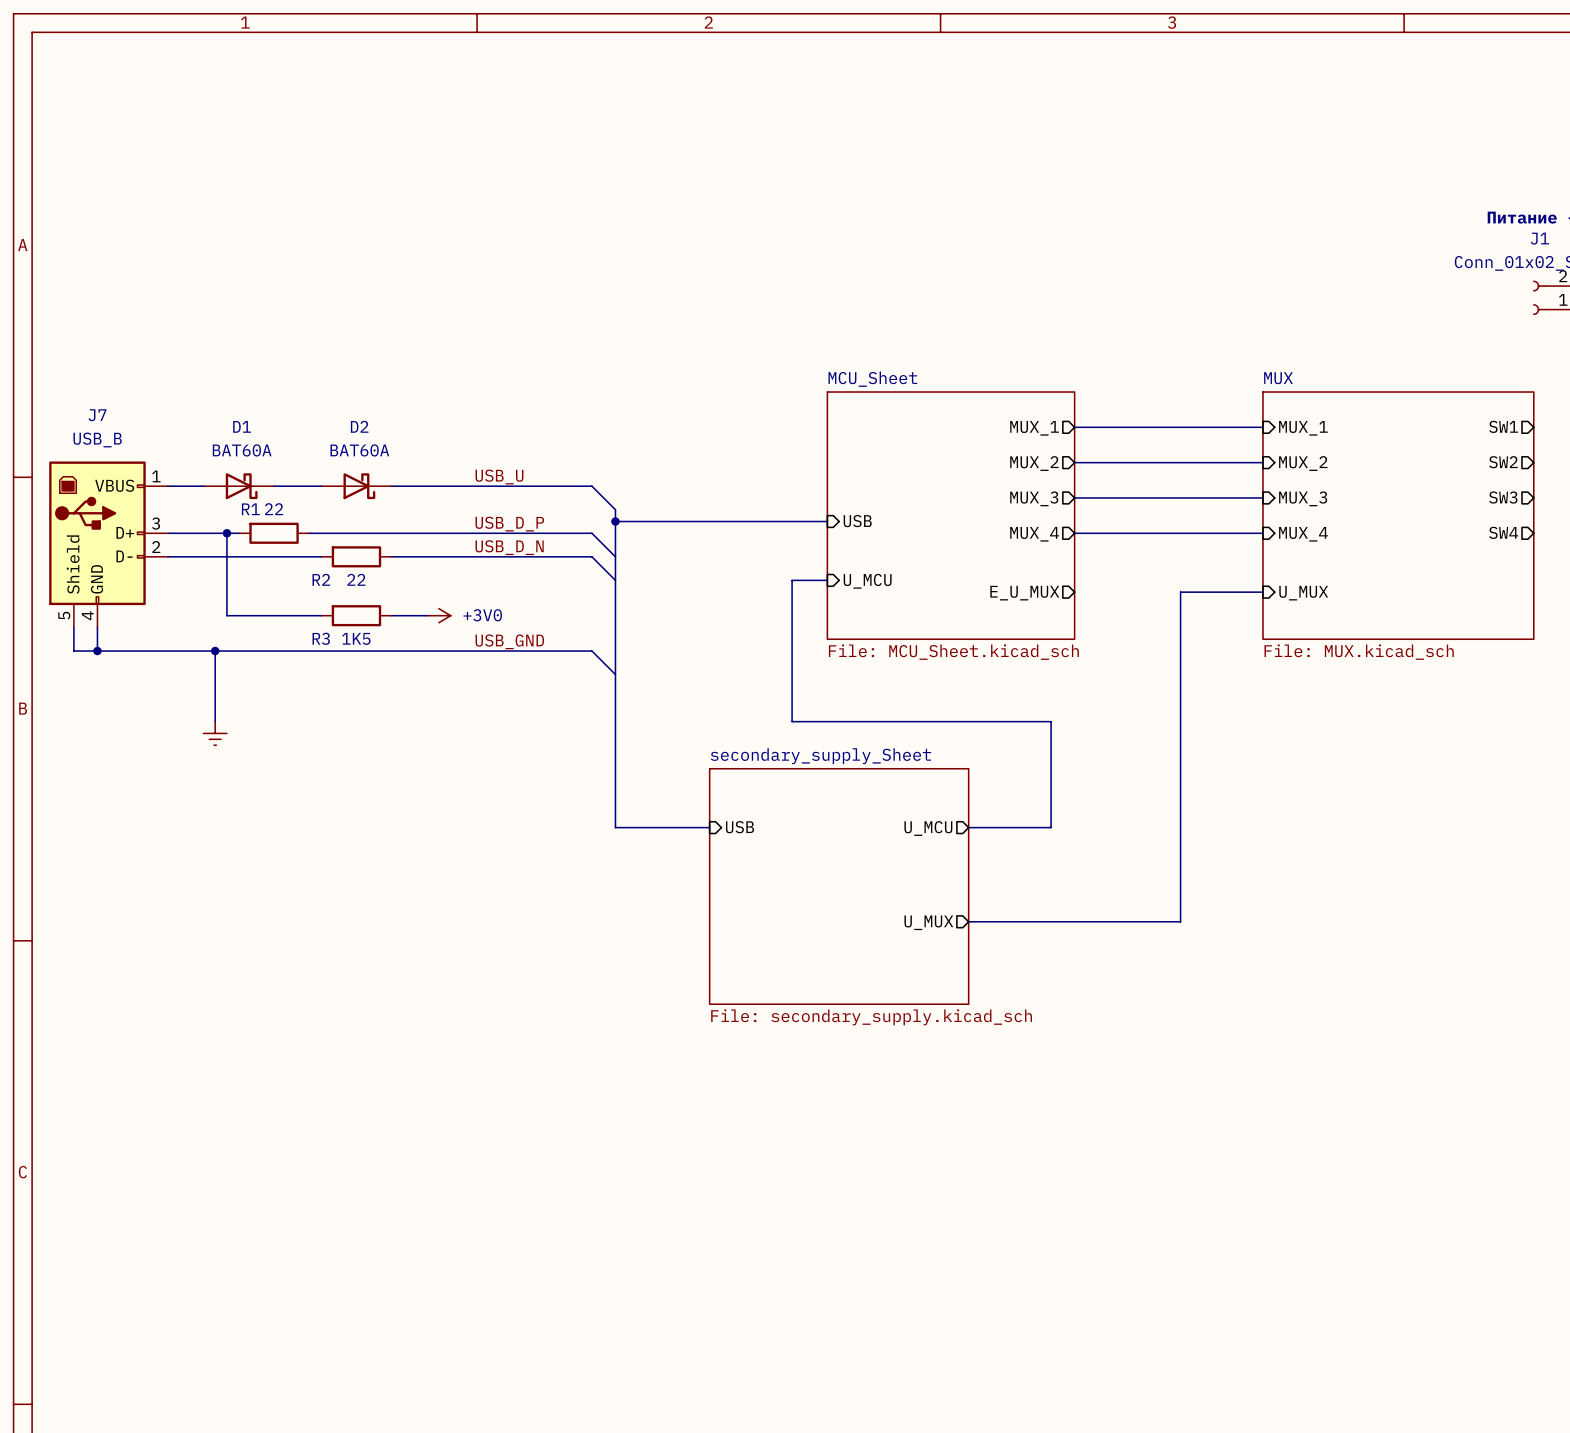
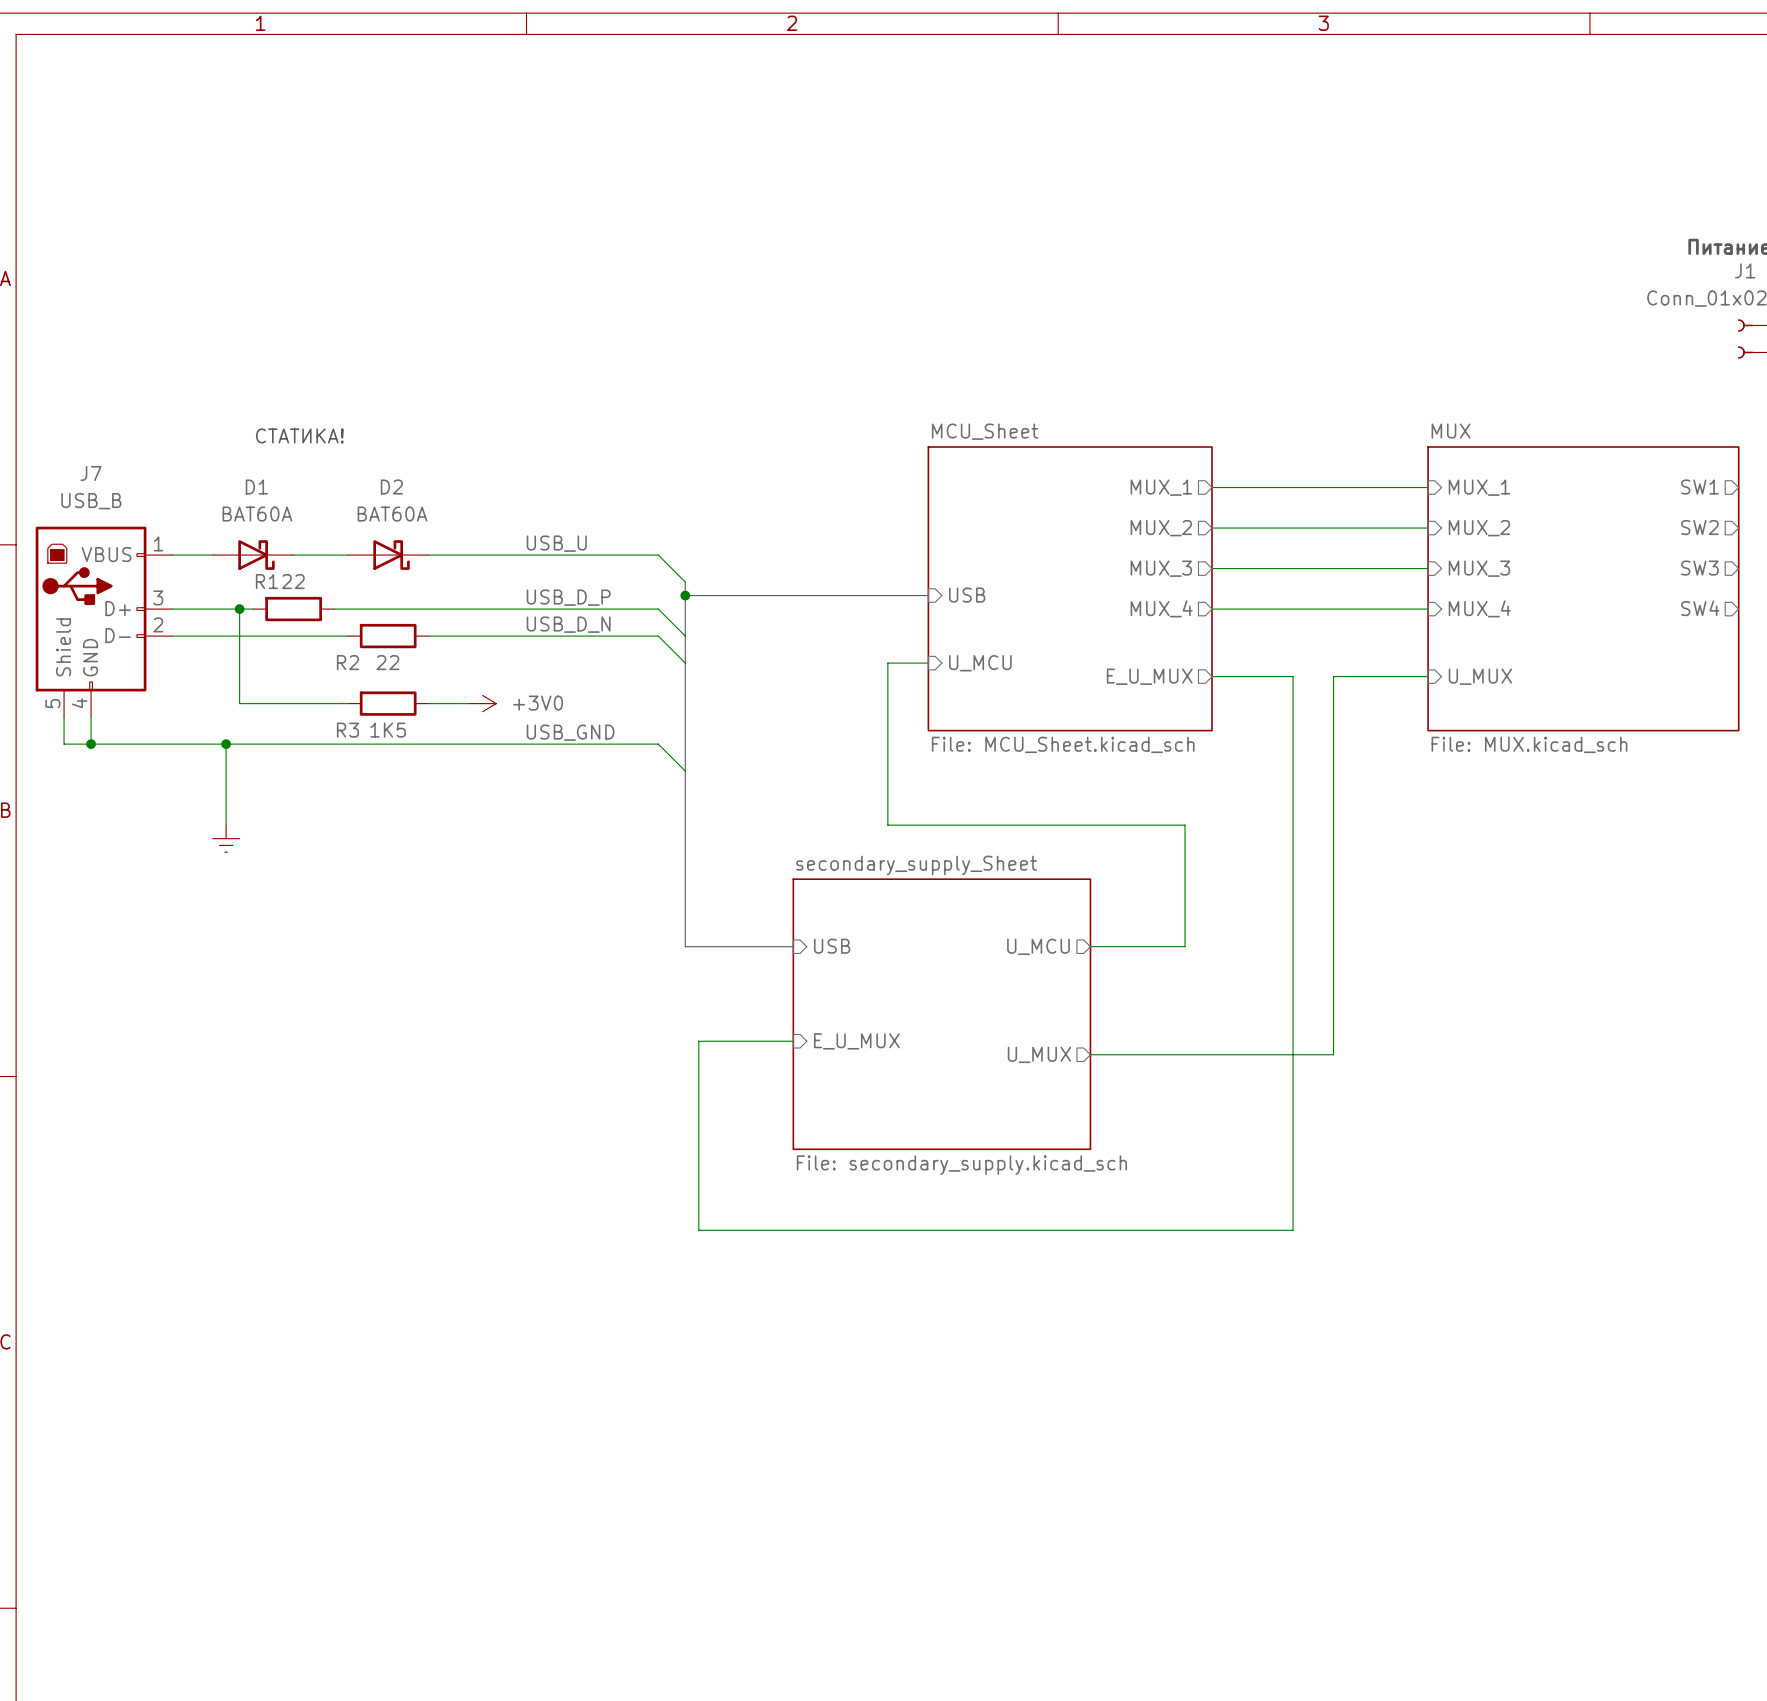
text: none -> СТАТИКА! (299, 435)
wire: none -> (1212, 676) (1293, 676) (1293, 1230) (698, 1230) (698, 1041) (793, 1041)
sheet pin: none -> E_U_MUX (856, 1041)

